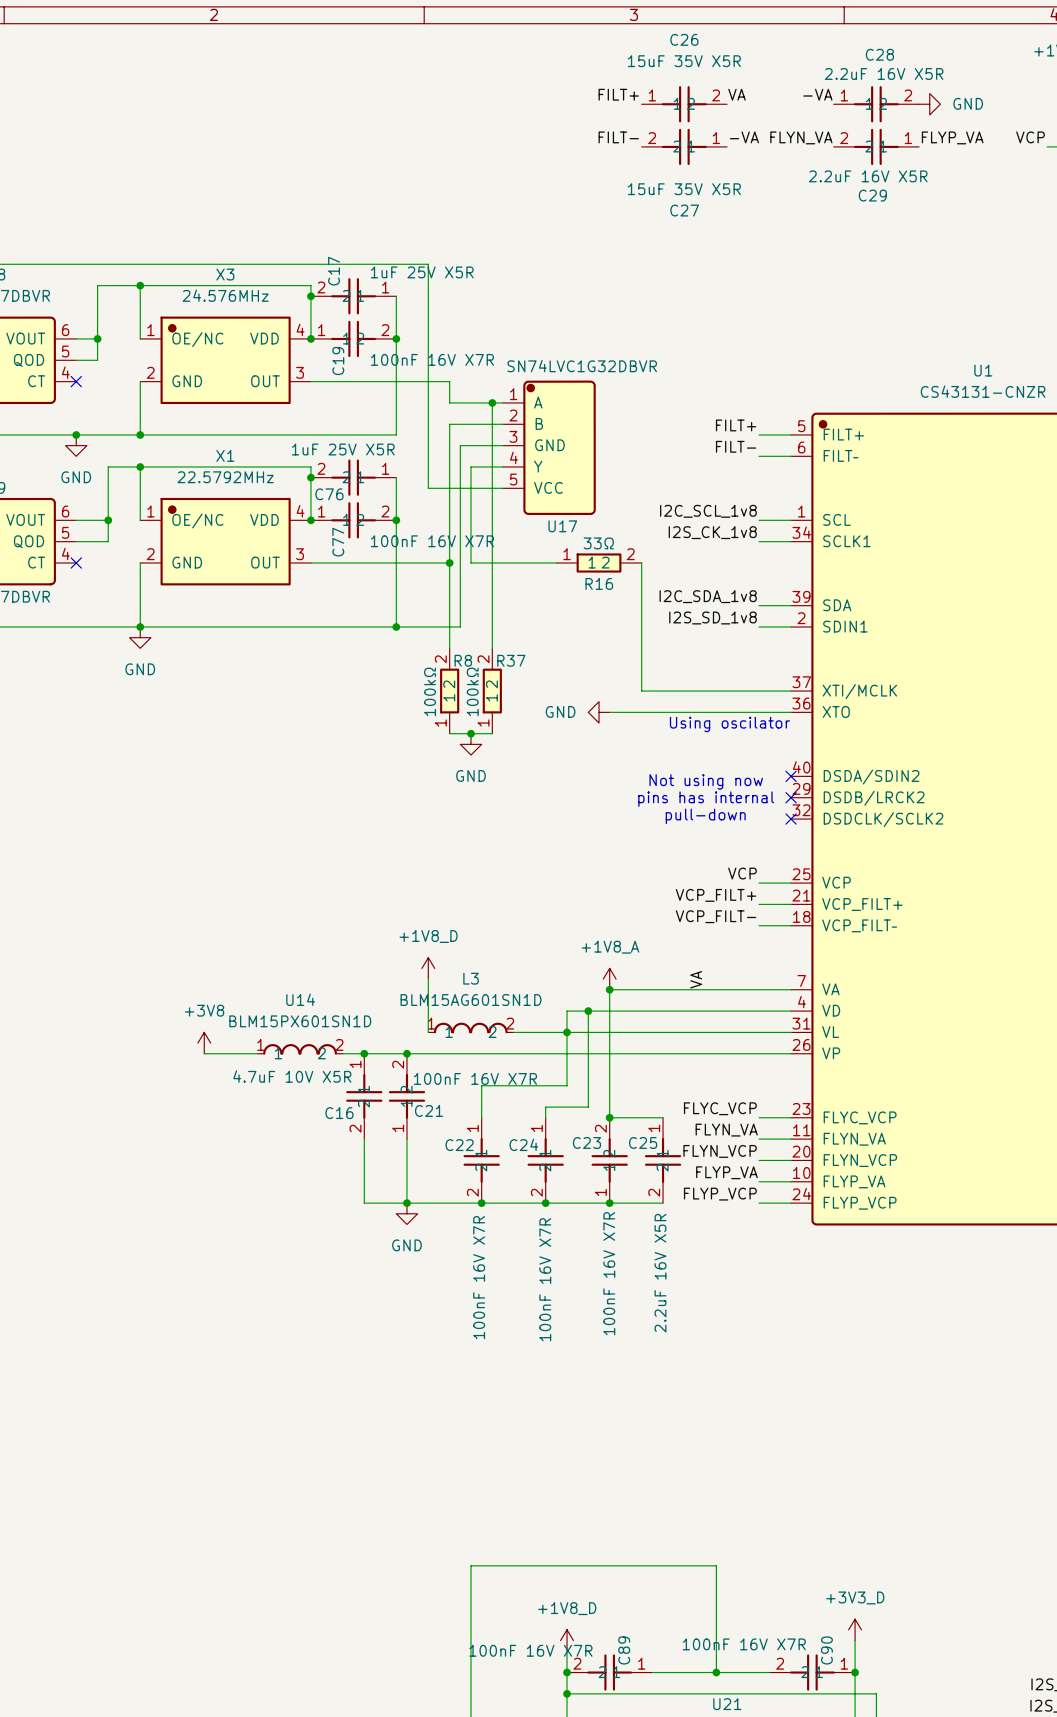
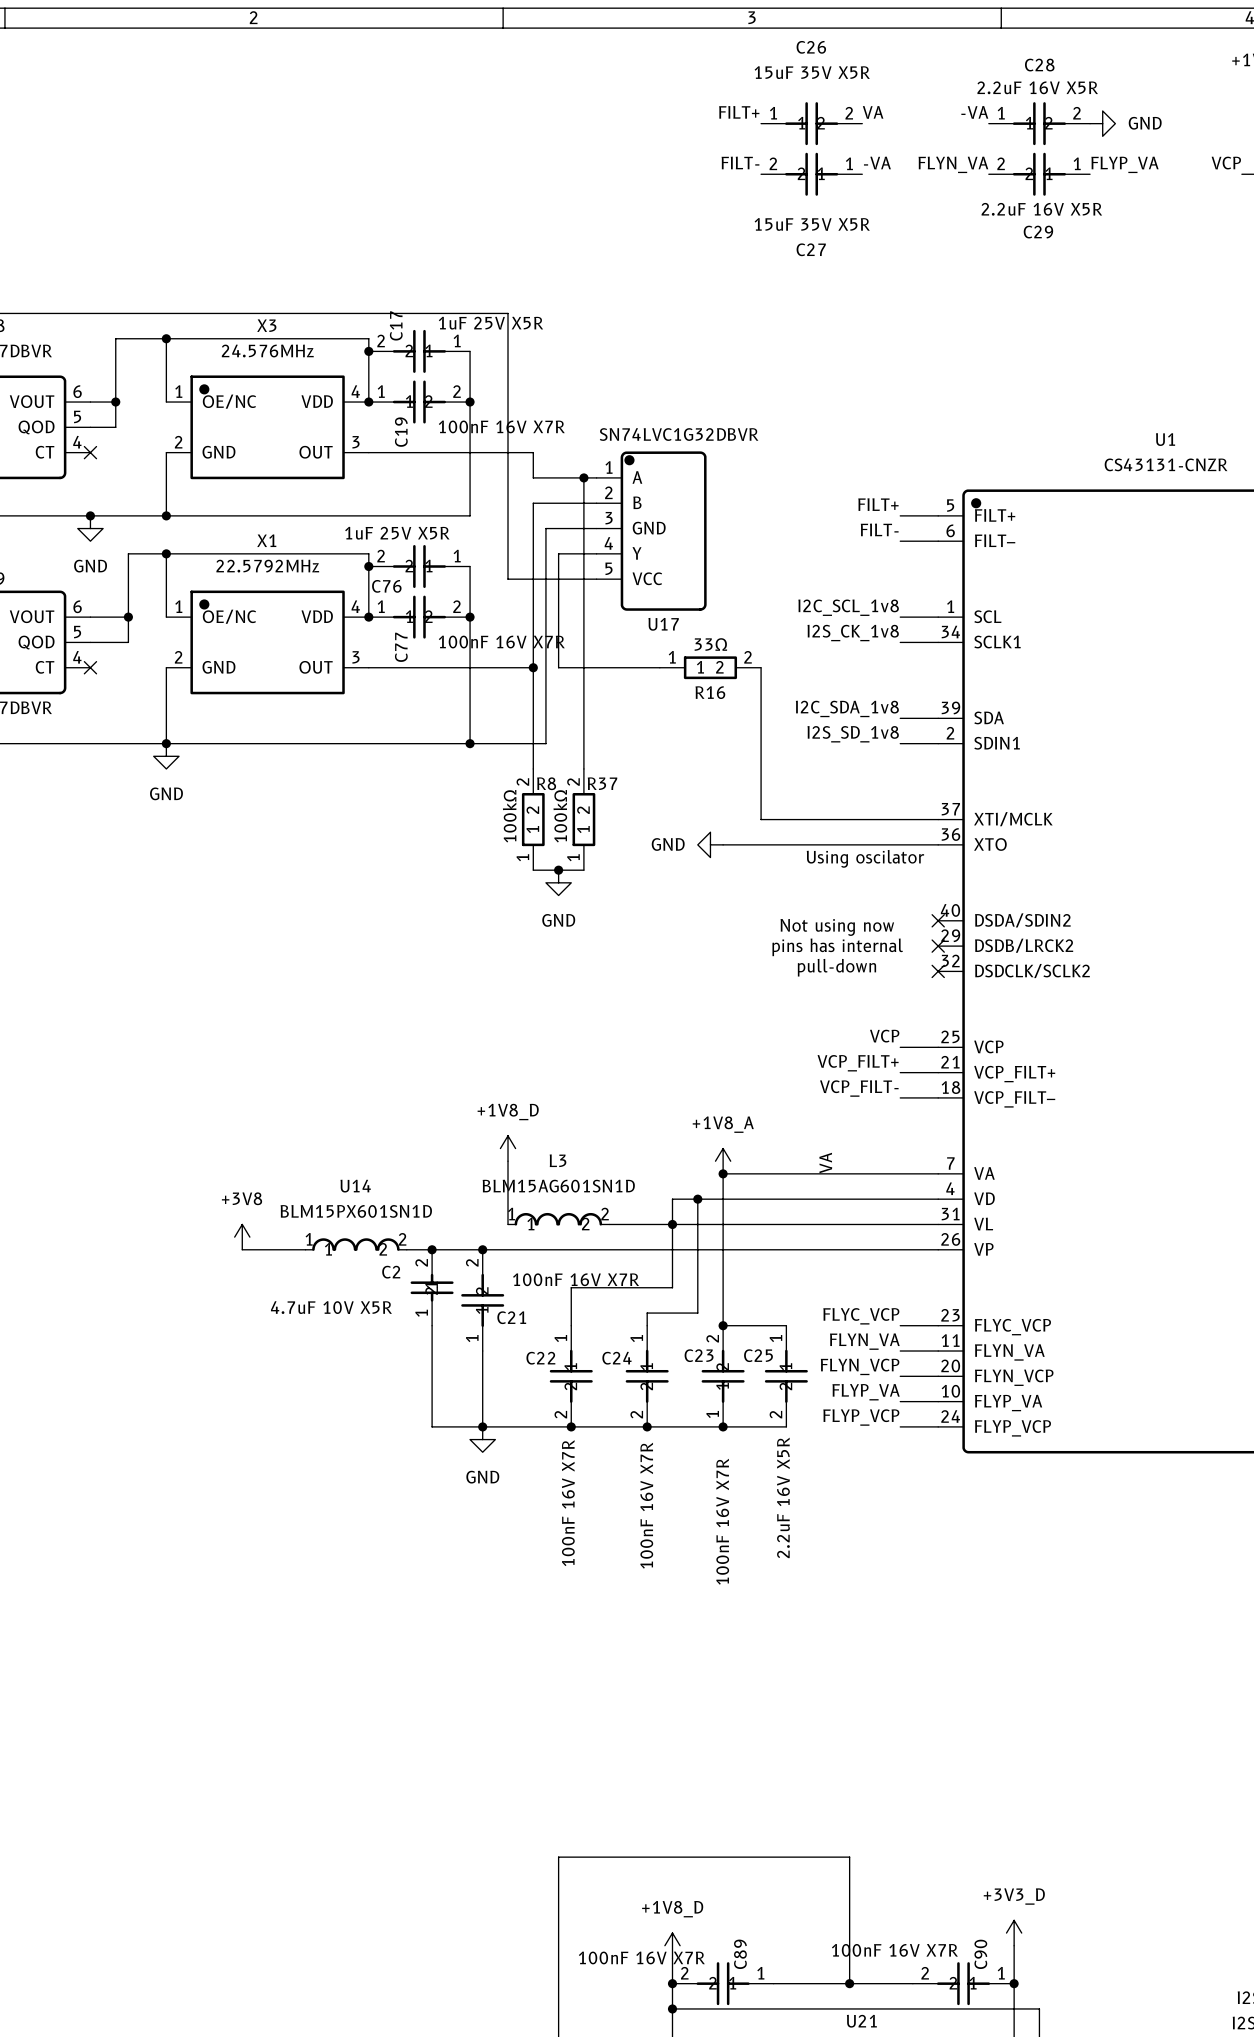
C2: none -> 4.7uF 10V X5R (432, 1287)
C16: 4.7uF 10V X5R (364, 1096) -> none

